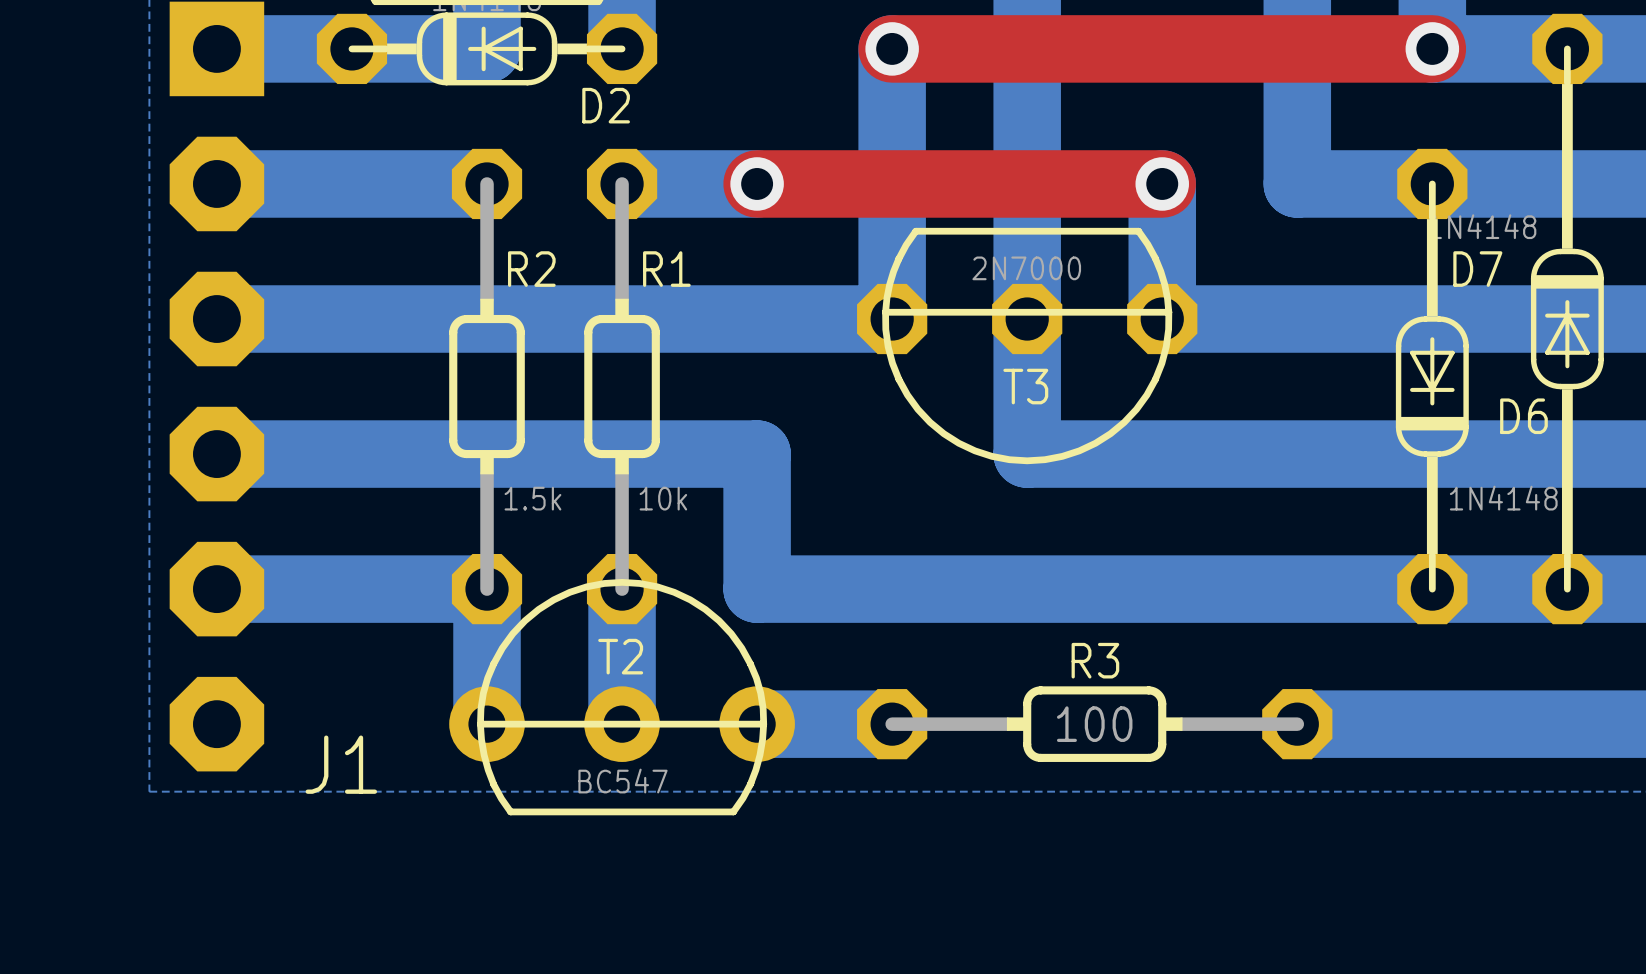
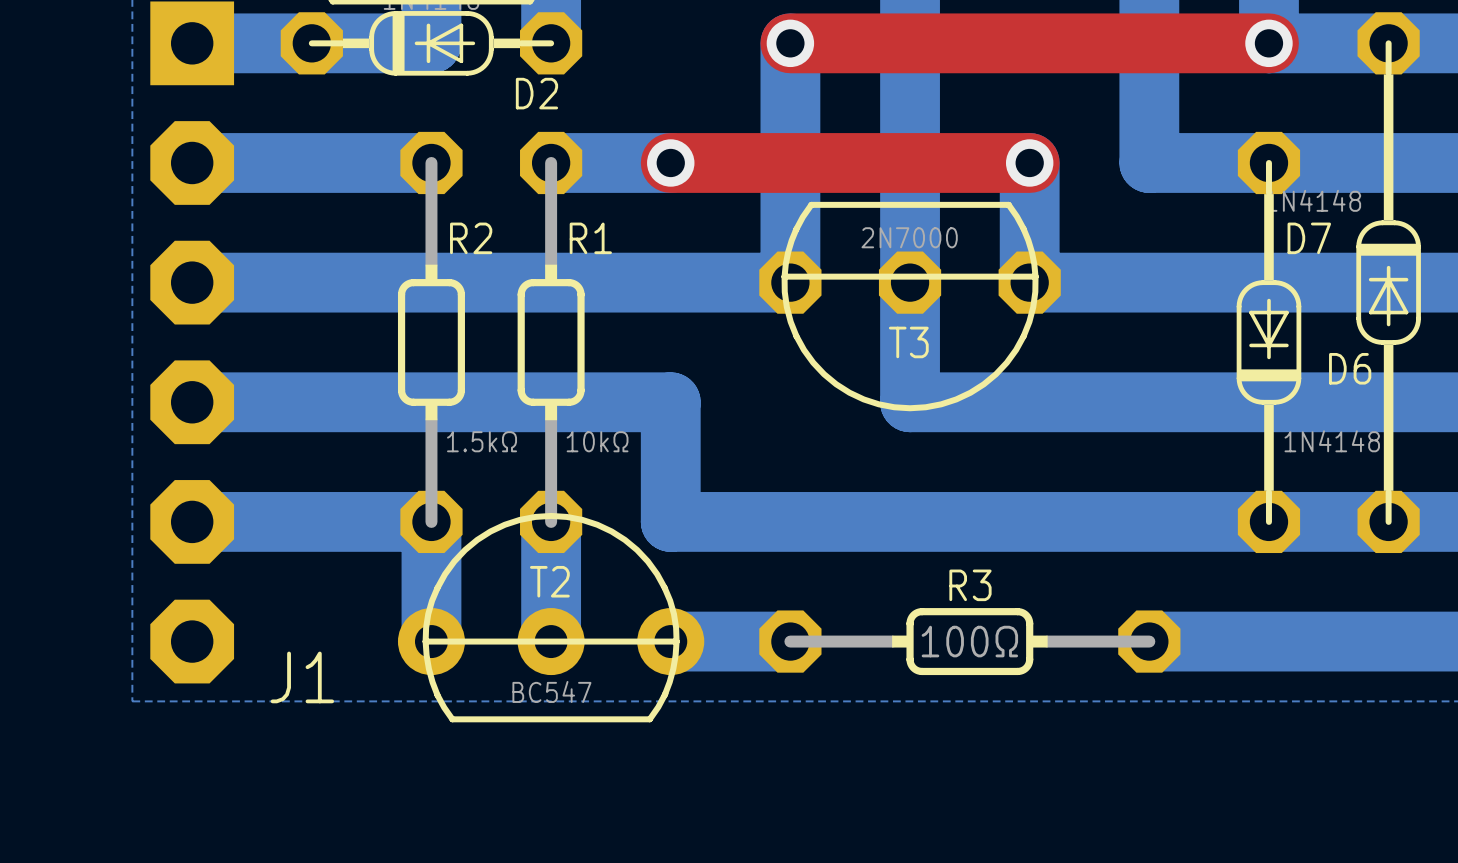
R2 value: 1.5k (532, 498) -> 1.5kΩ (482, 441)
R1 value: 10k (663, 498) -> 10kΩ (597, 441)
R3 value: 100 (1094, 724) -> 100Ω (969, 641)

